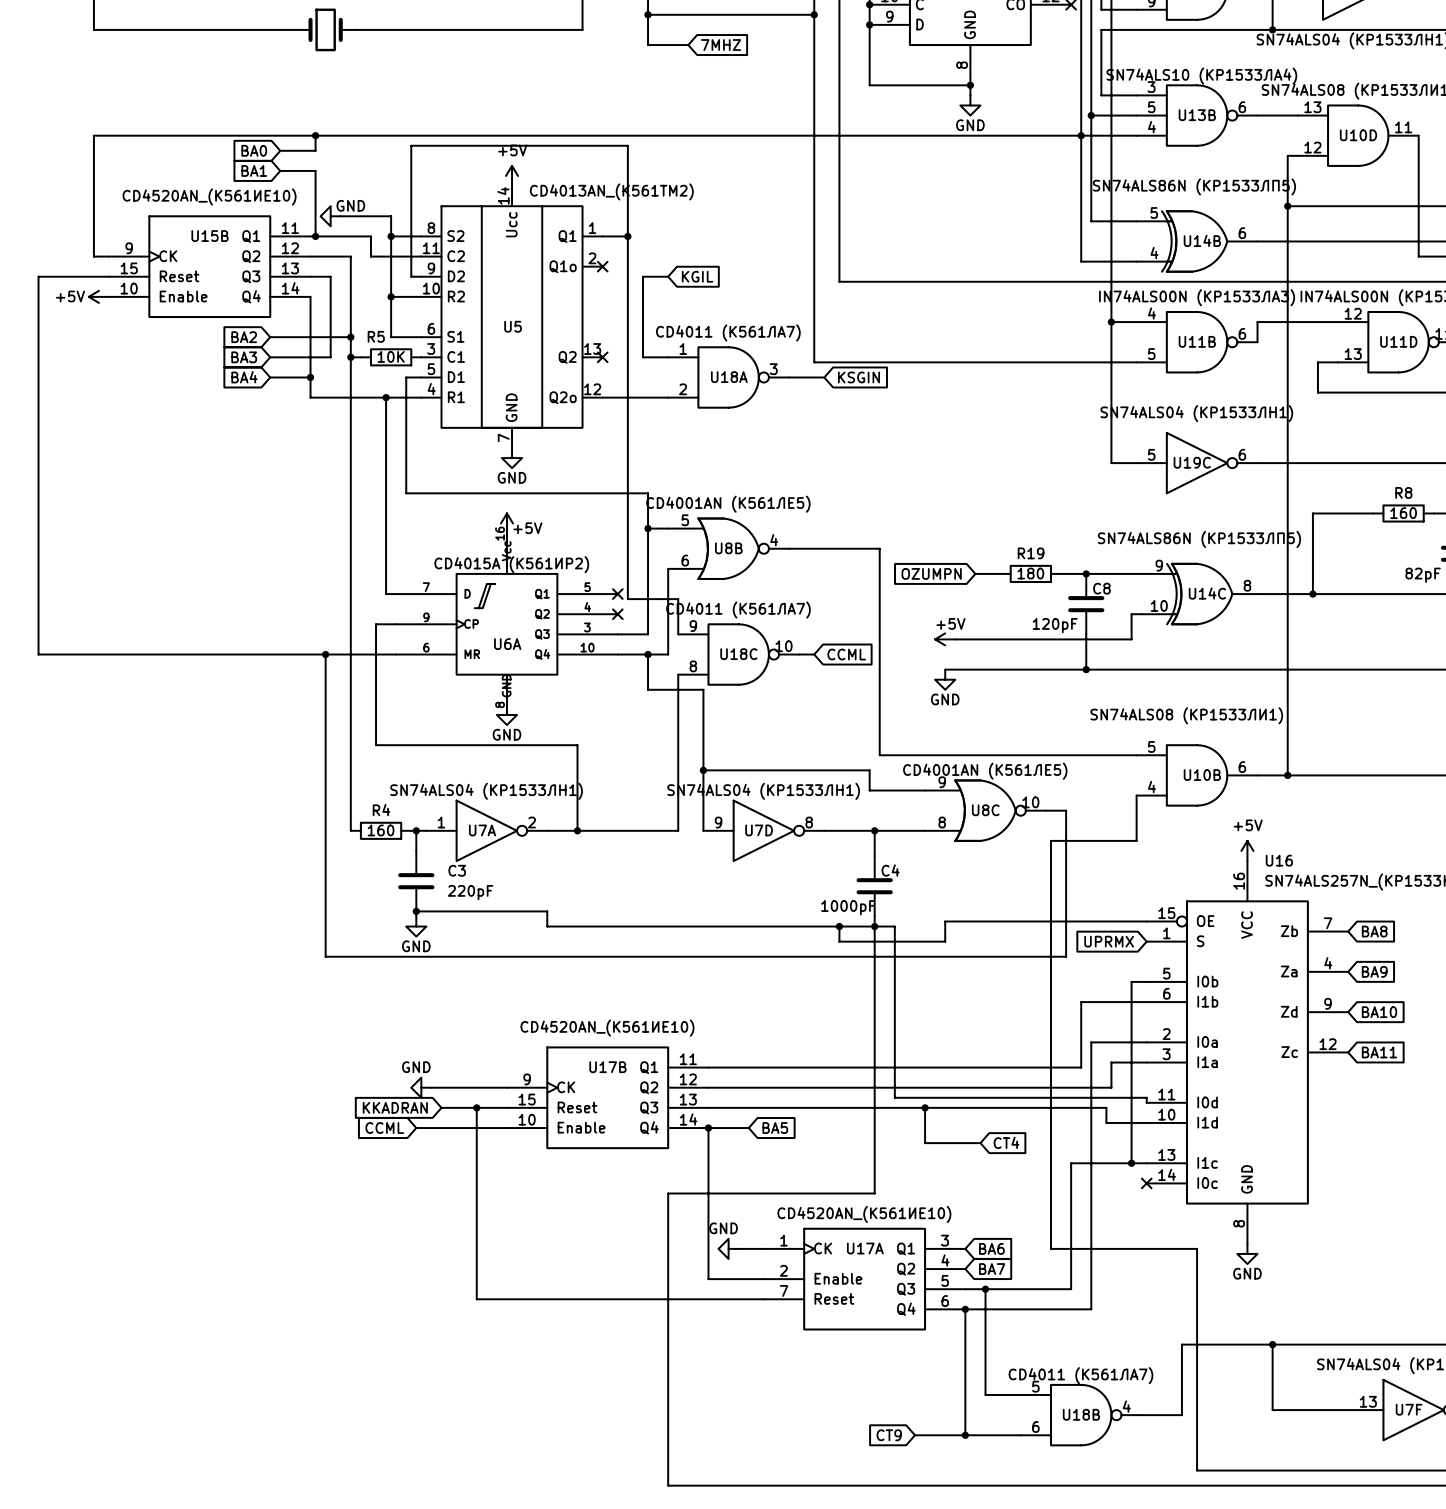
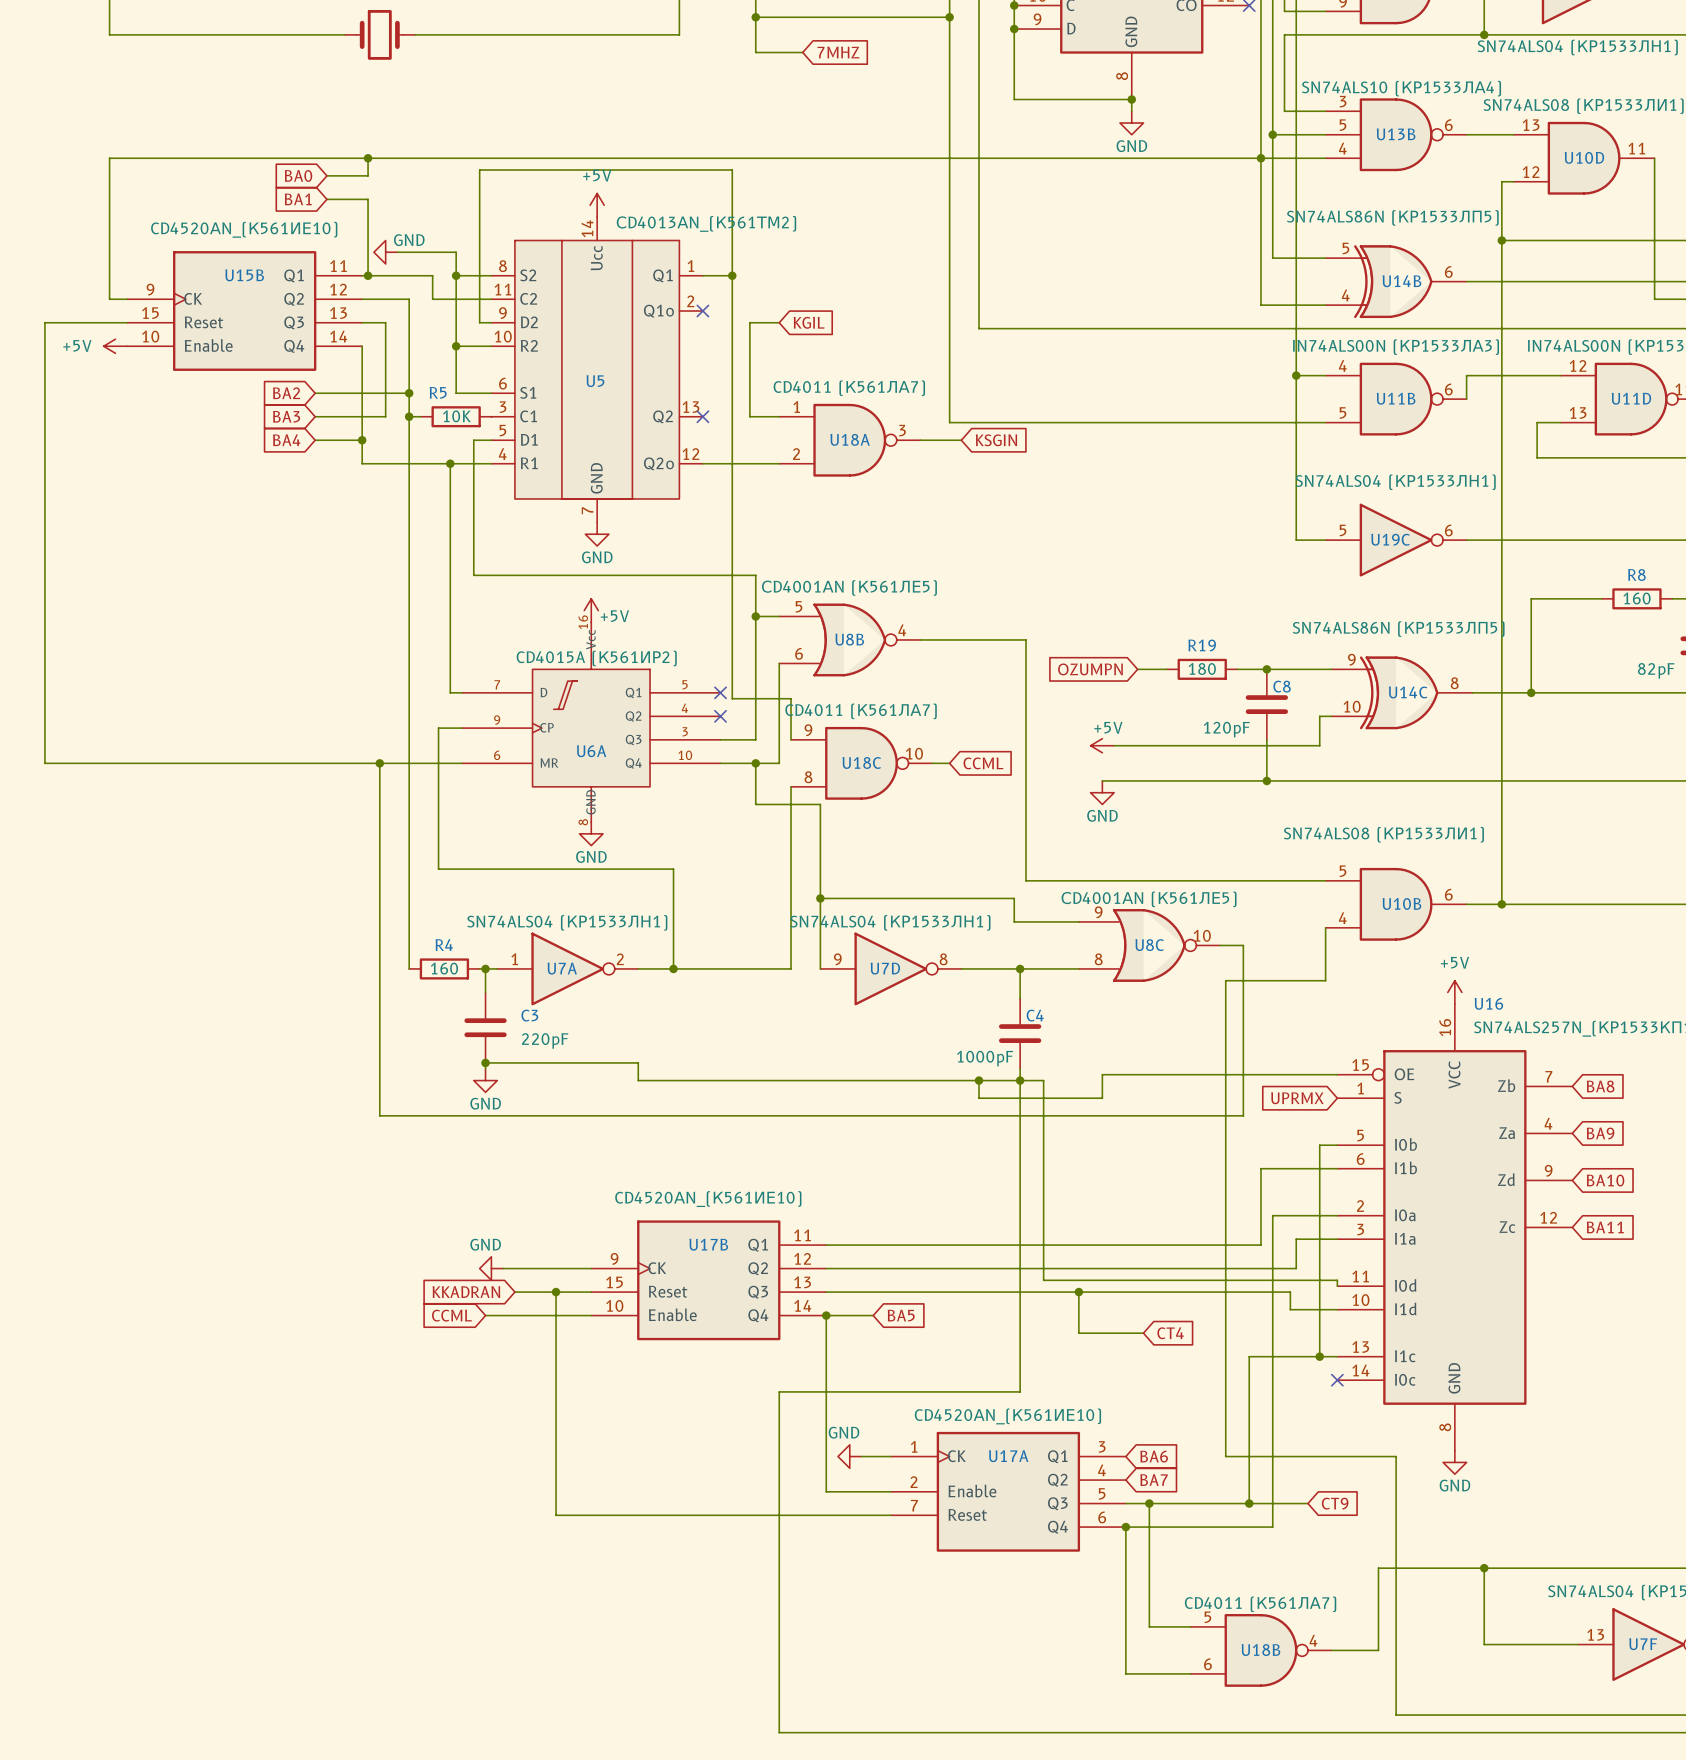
wire: none -> (1249, 1503) (1307, 1503)
junction: none -> (1249, 1503)
global label: none -> CT9 (1335, 1503)
global label: CT9 (889, 1435) -> none
wire: (914, 1435) (965, 1435) -> none
junction: (965, 1435) -> none

